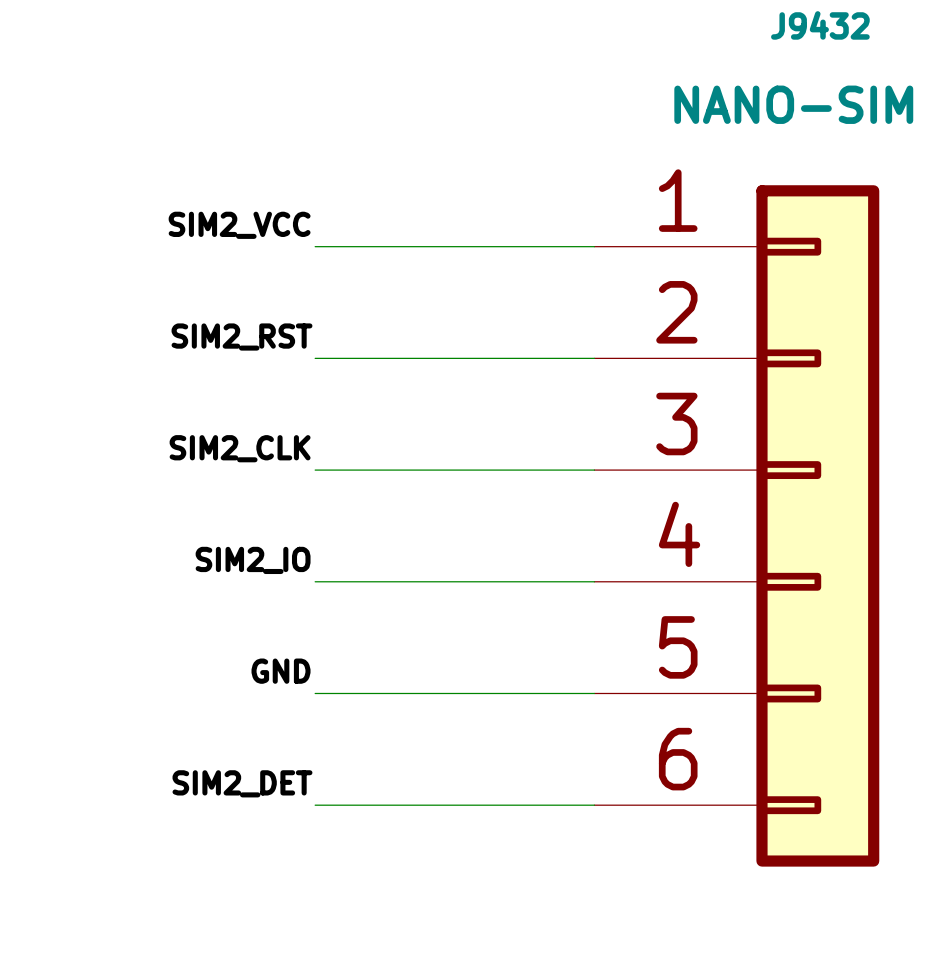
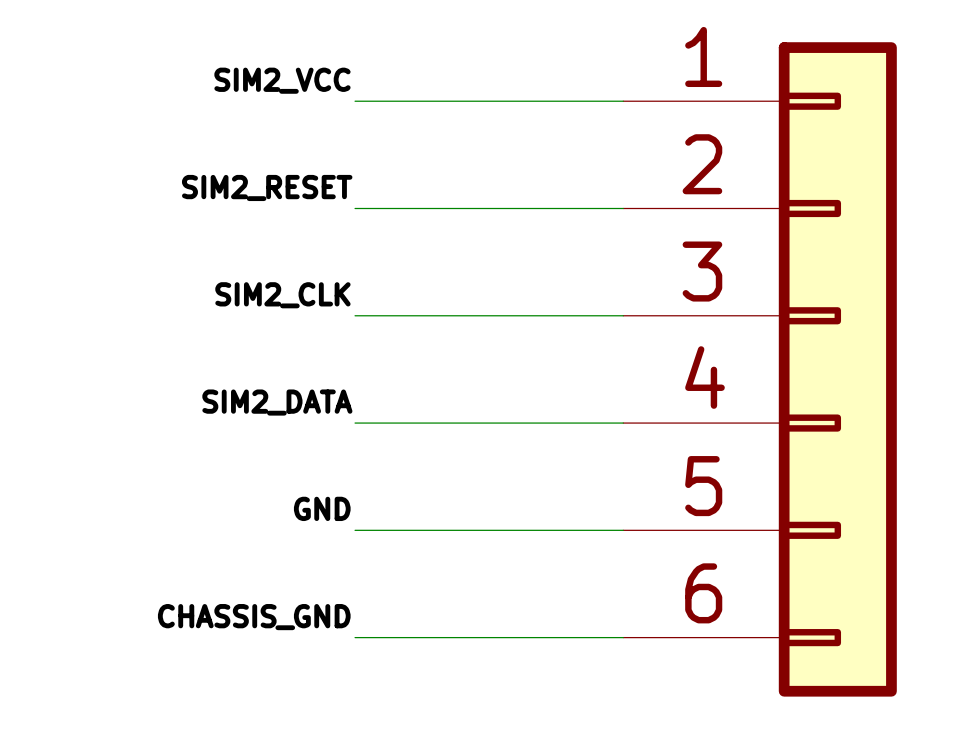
label: SIM2_RST (242, 337) -> SIM2_RESET (267, 187)
label: SIM2_IO (253, 560) -> SIM2_DATA (277, 402)
label: SIM2_DET (242, 783) -> CHASSIS_GND (254, 617)

